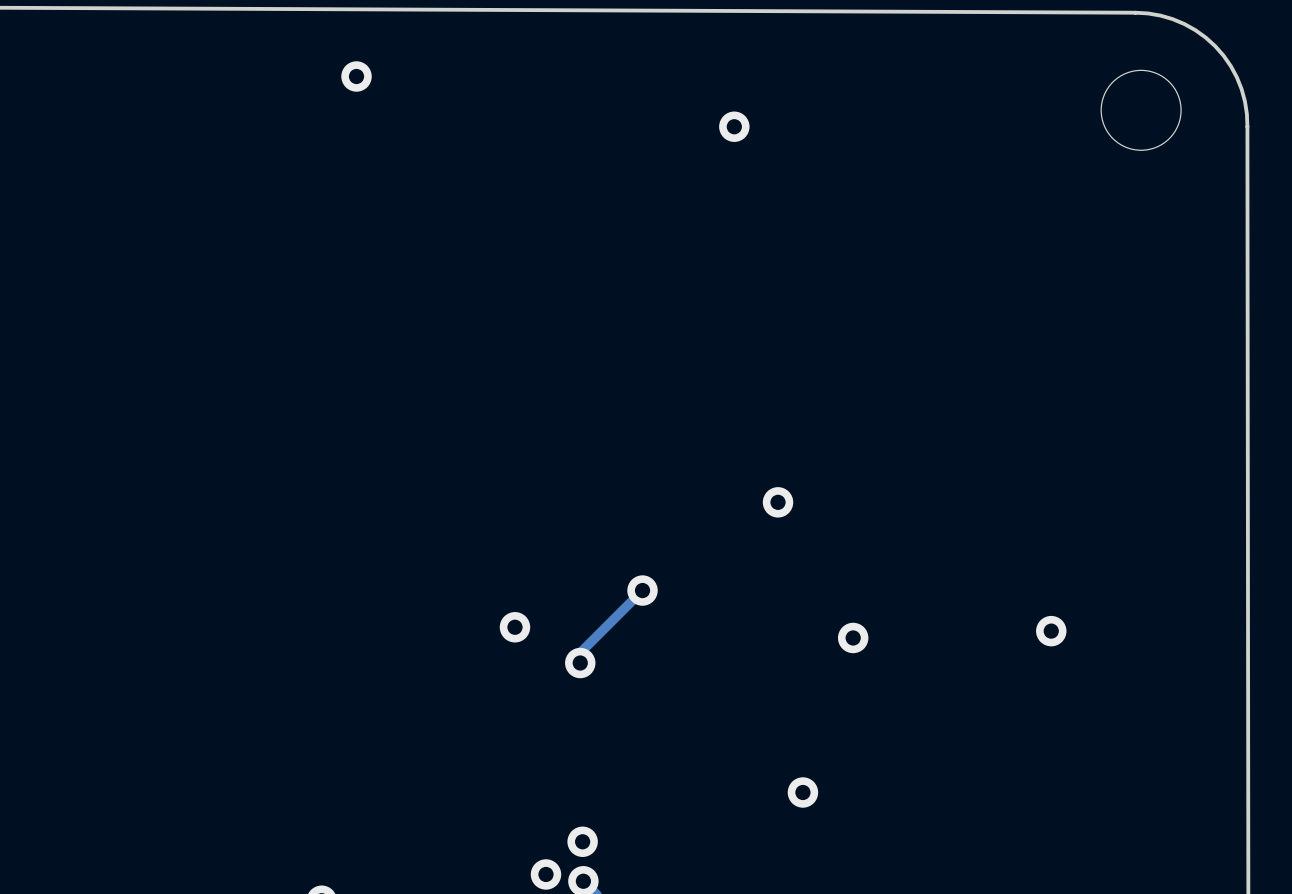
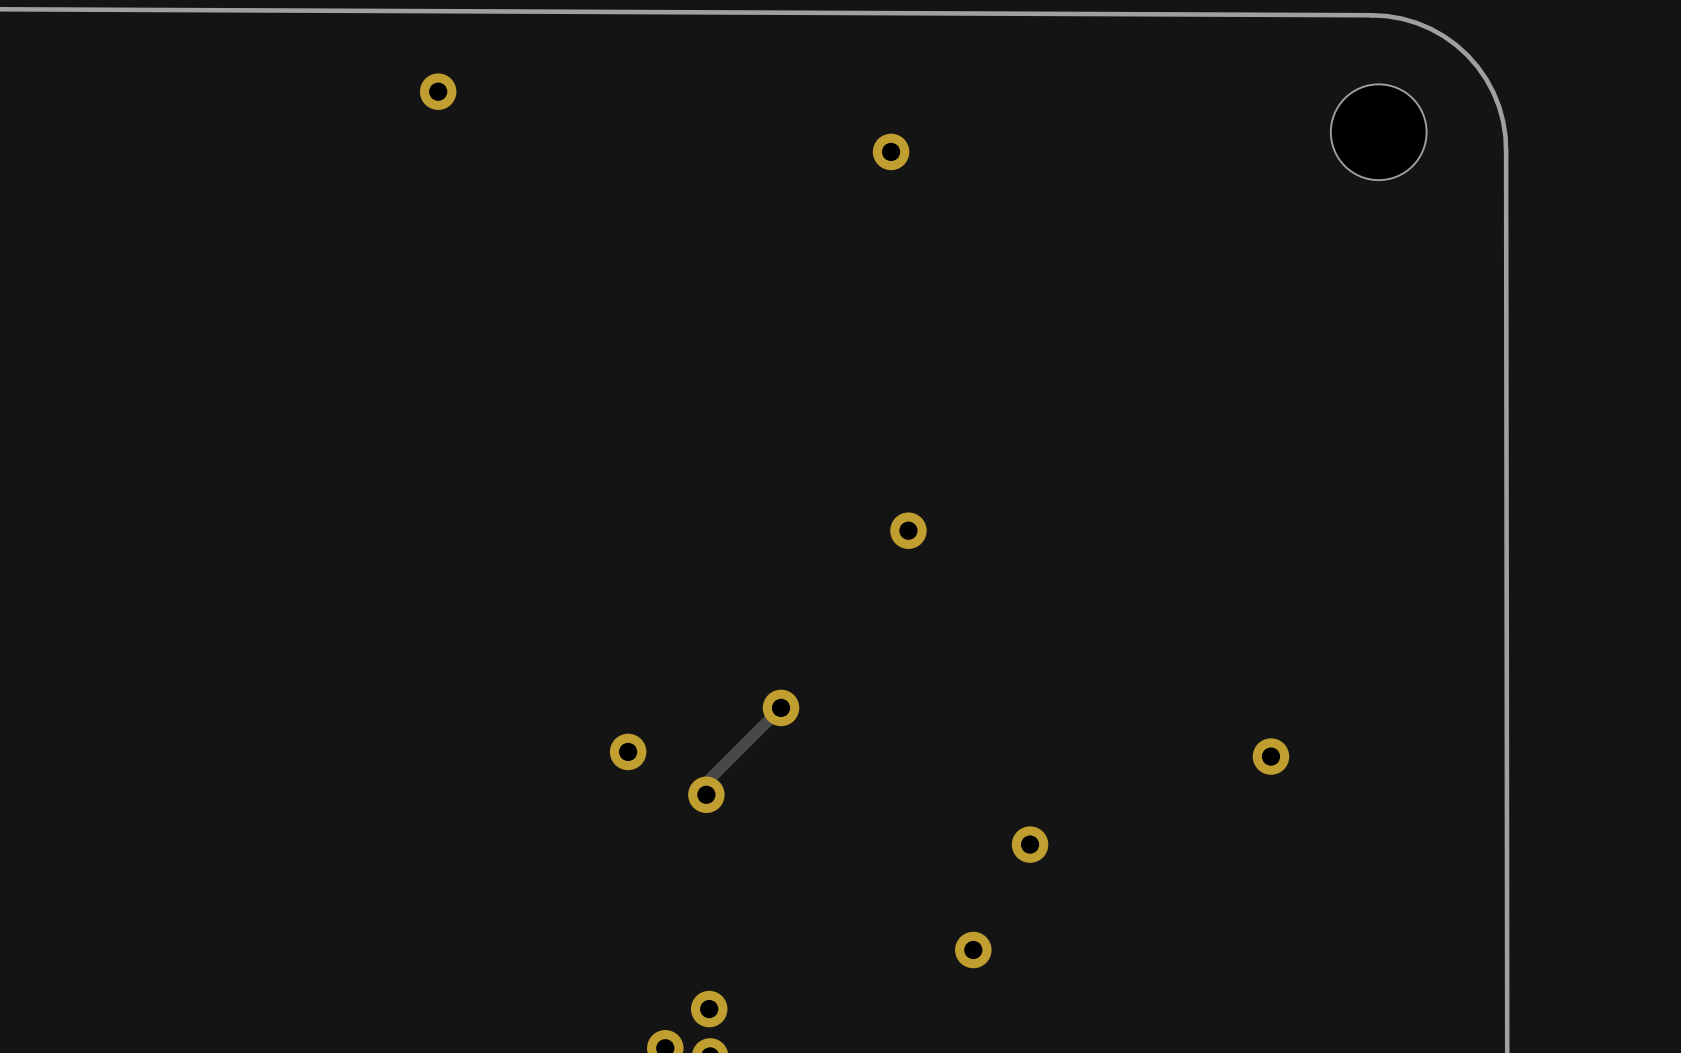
via position: (778, 502) -> (908, 530)
via position: (853, 637) -> (1030, 844)

